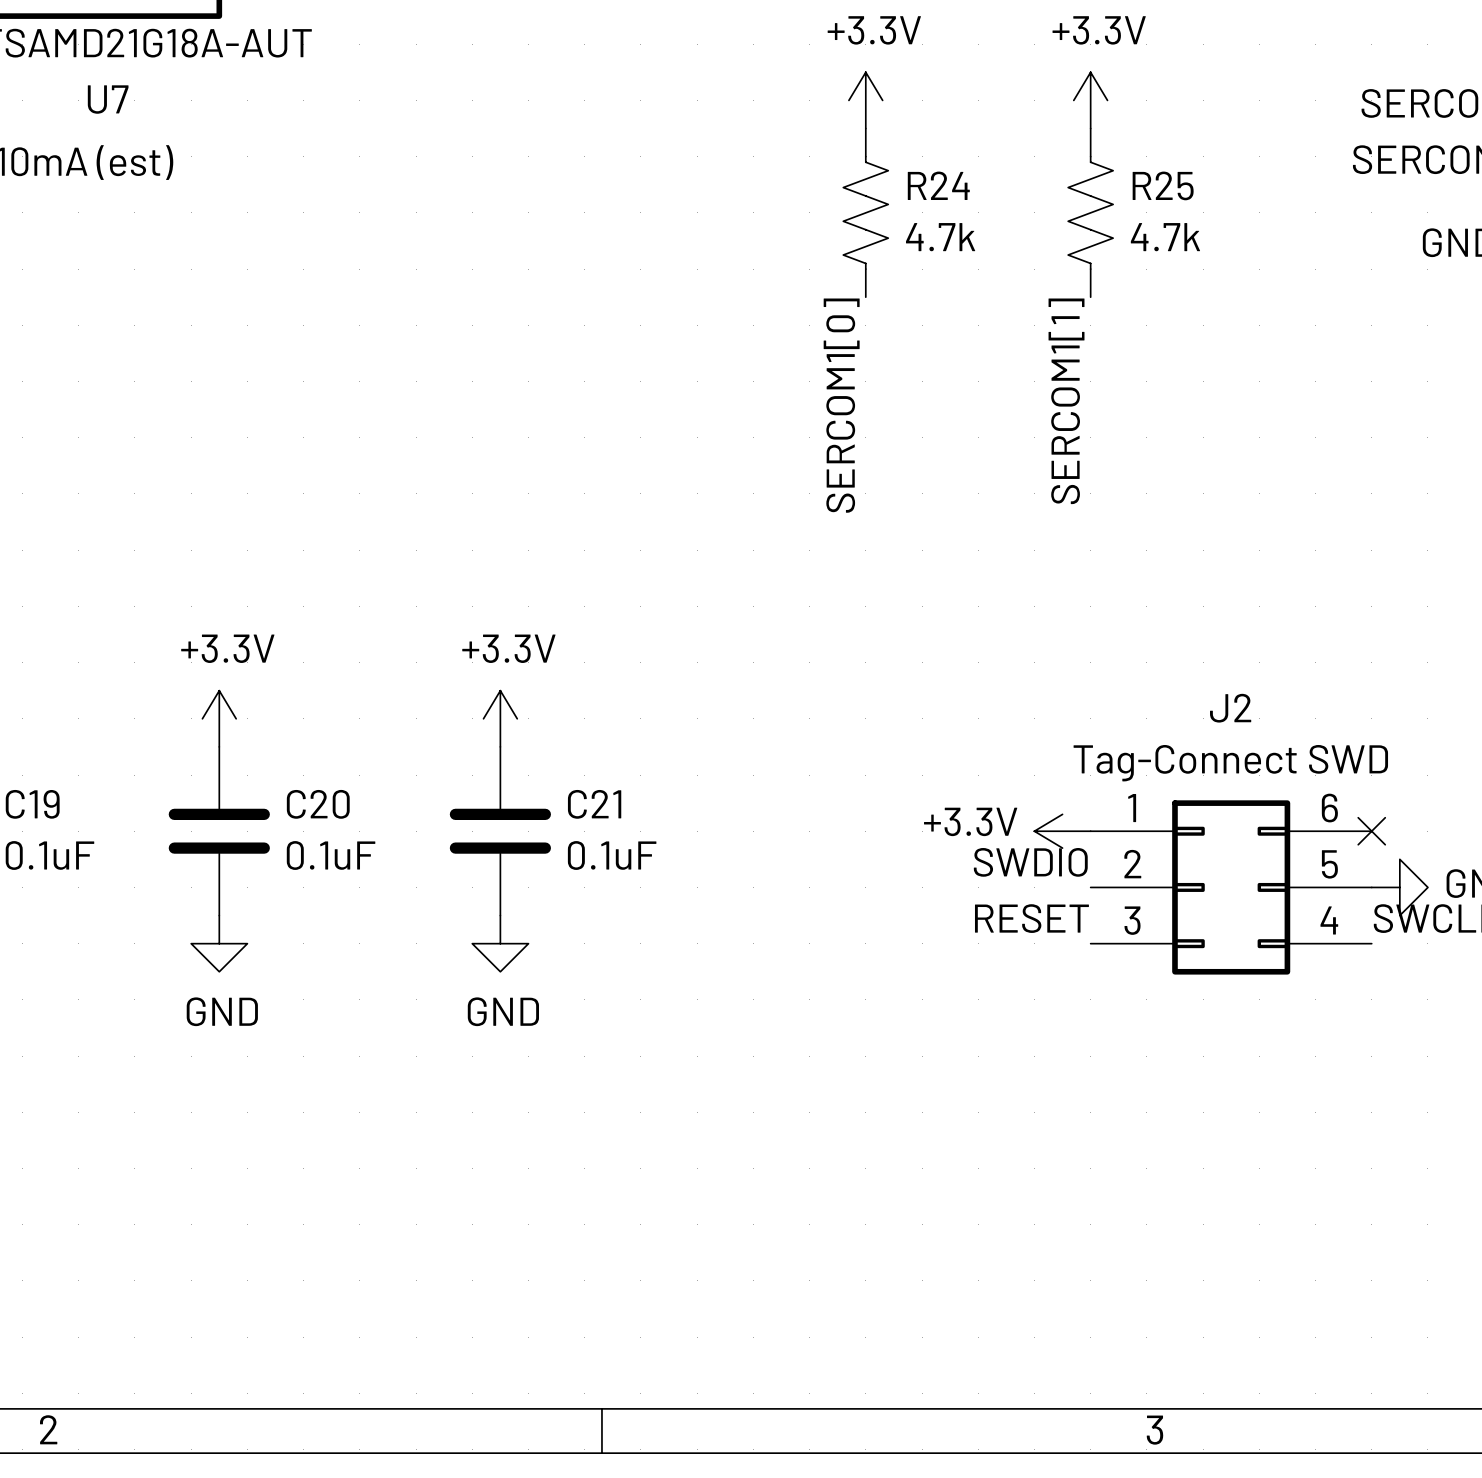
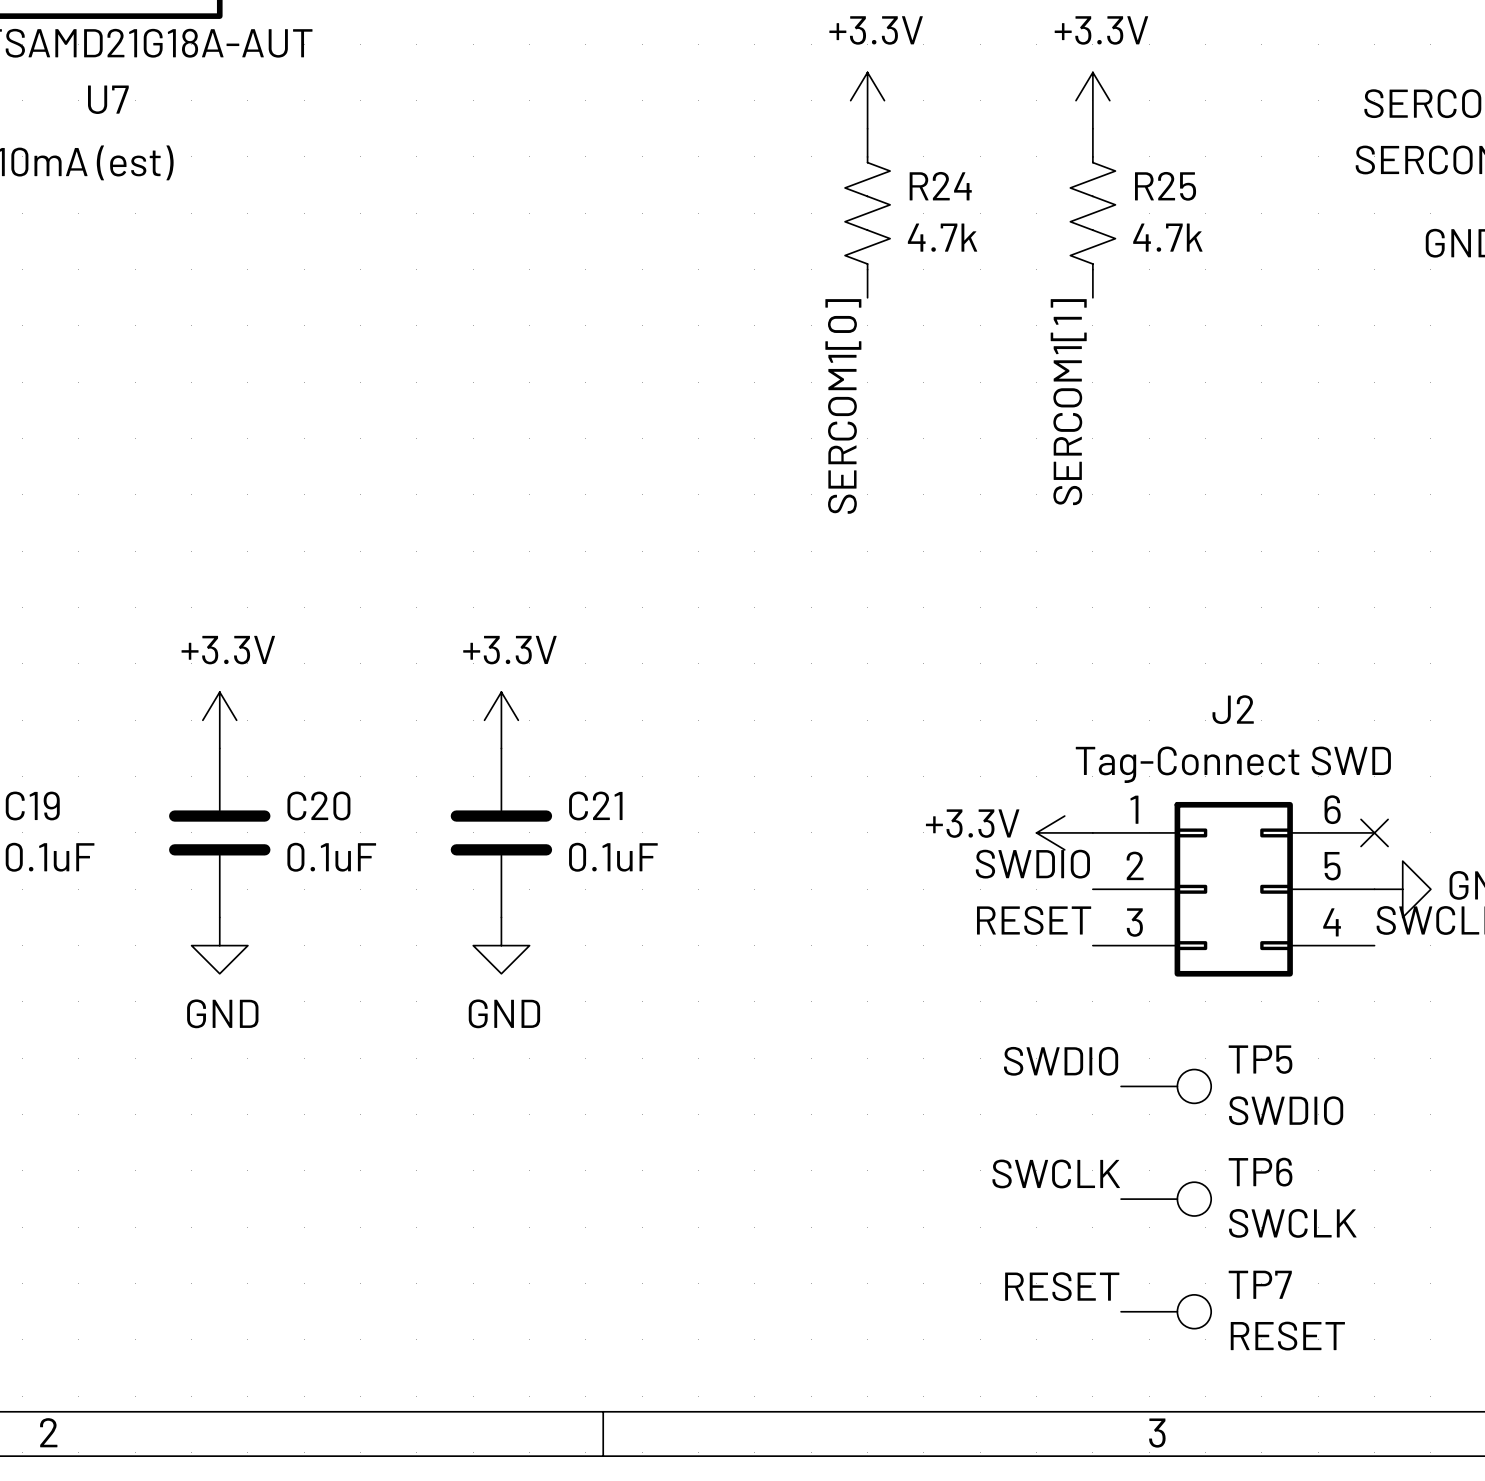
label: none -> SWDIO (1061, 1061)
TP5: none -> SWDIO (1166, 1086)
label: none -> SWCLK (1056, 1173)
TP6: none -> SWCLK (1166, 1199)
label: none -> RESET (1062, 1286)
TP7: none -> RESET (1166, 1311)

